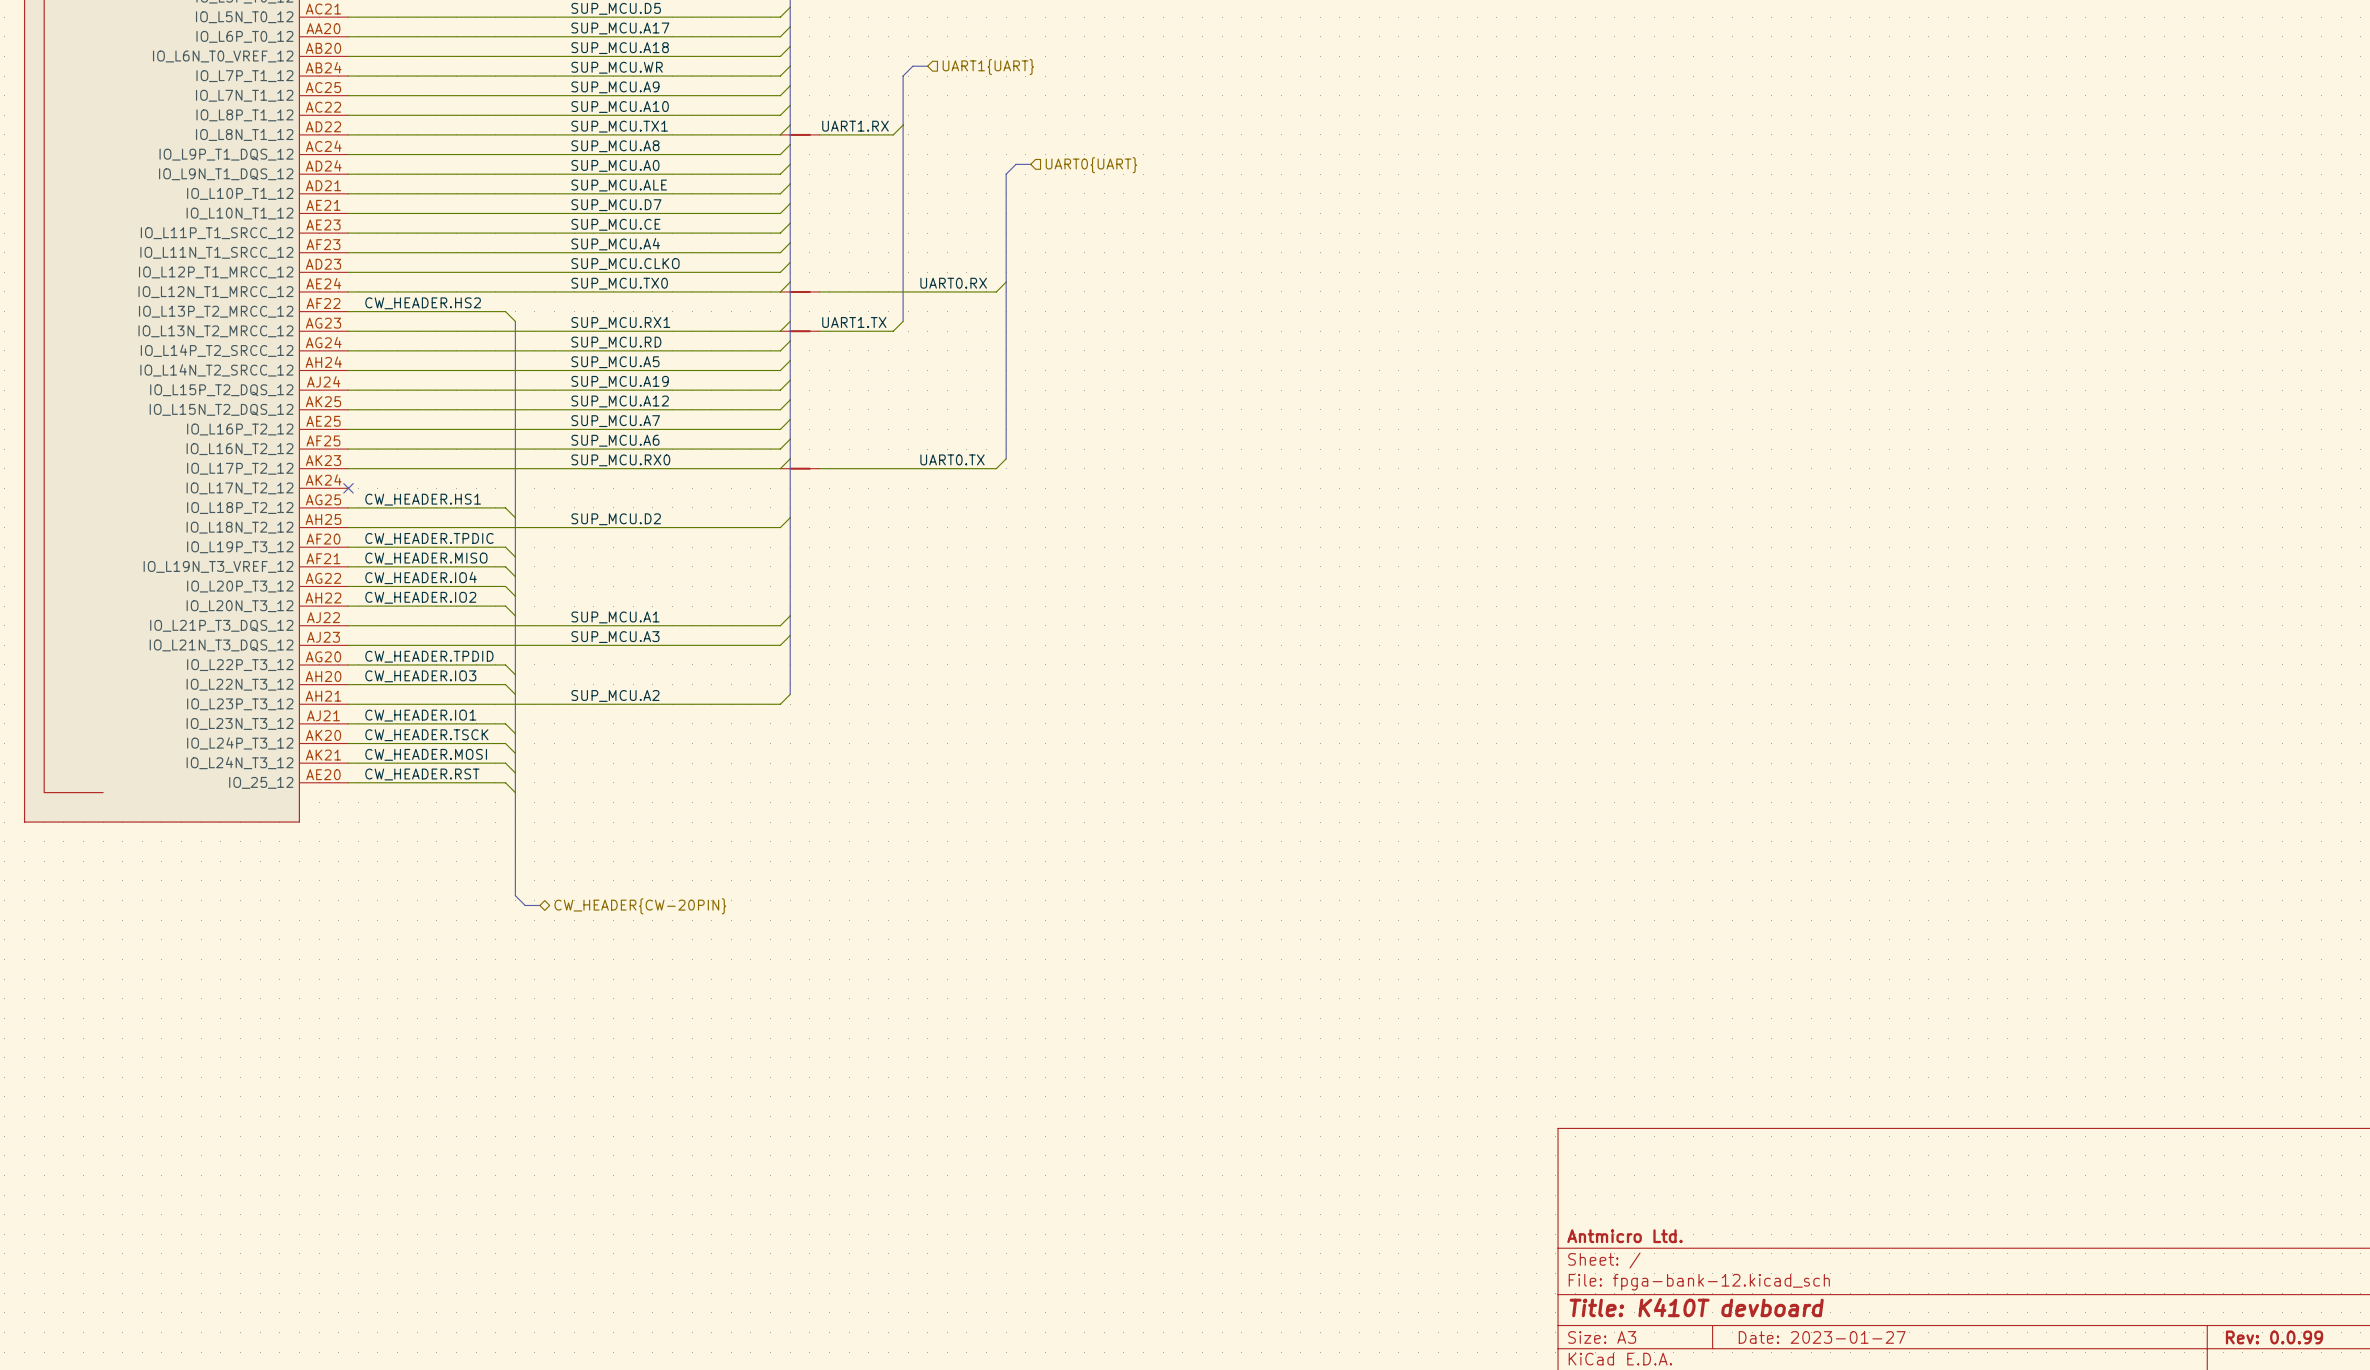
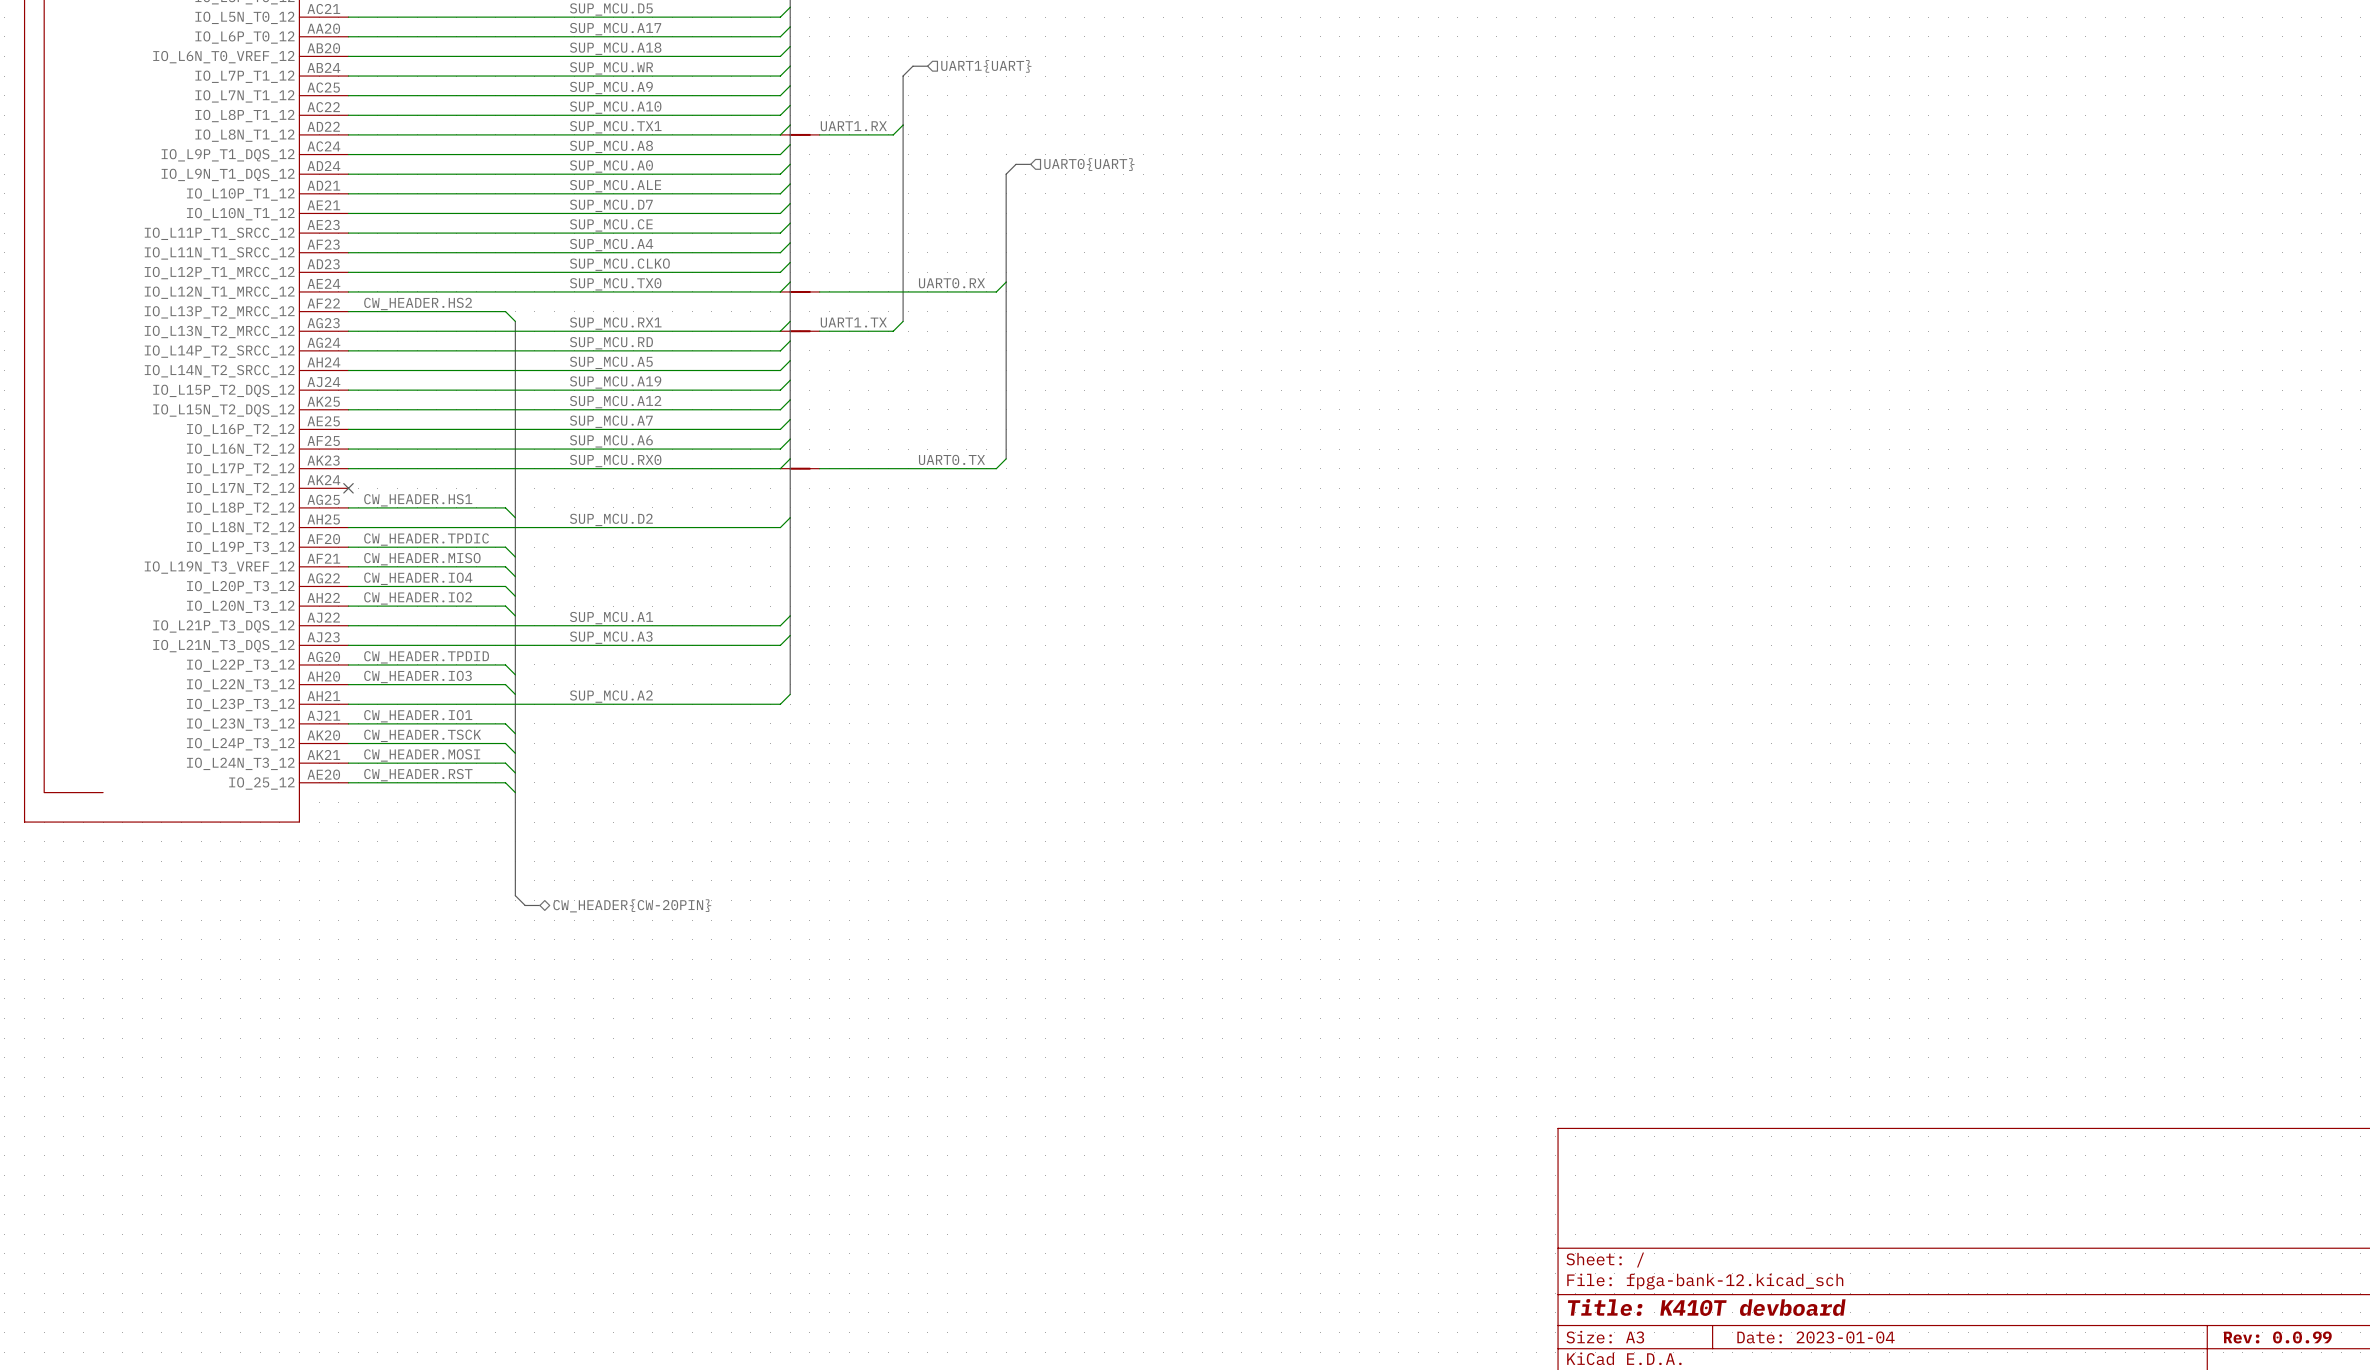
title block: Antmicro Ltd. (1624, 1236) -> none
title block: Date: 2023-01-27 (1822, 1337) -> Date: 2023-01-04 (1816, 1337)

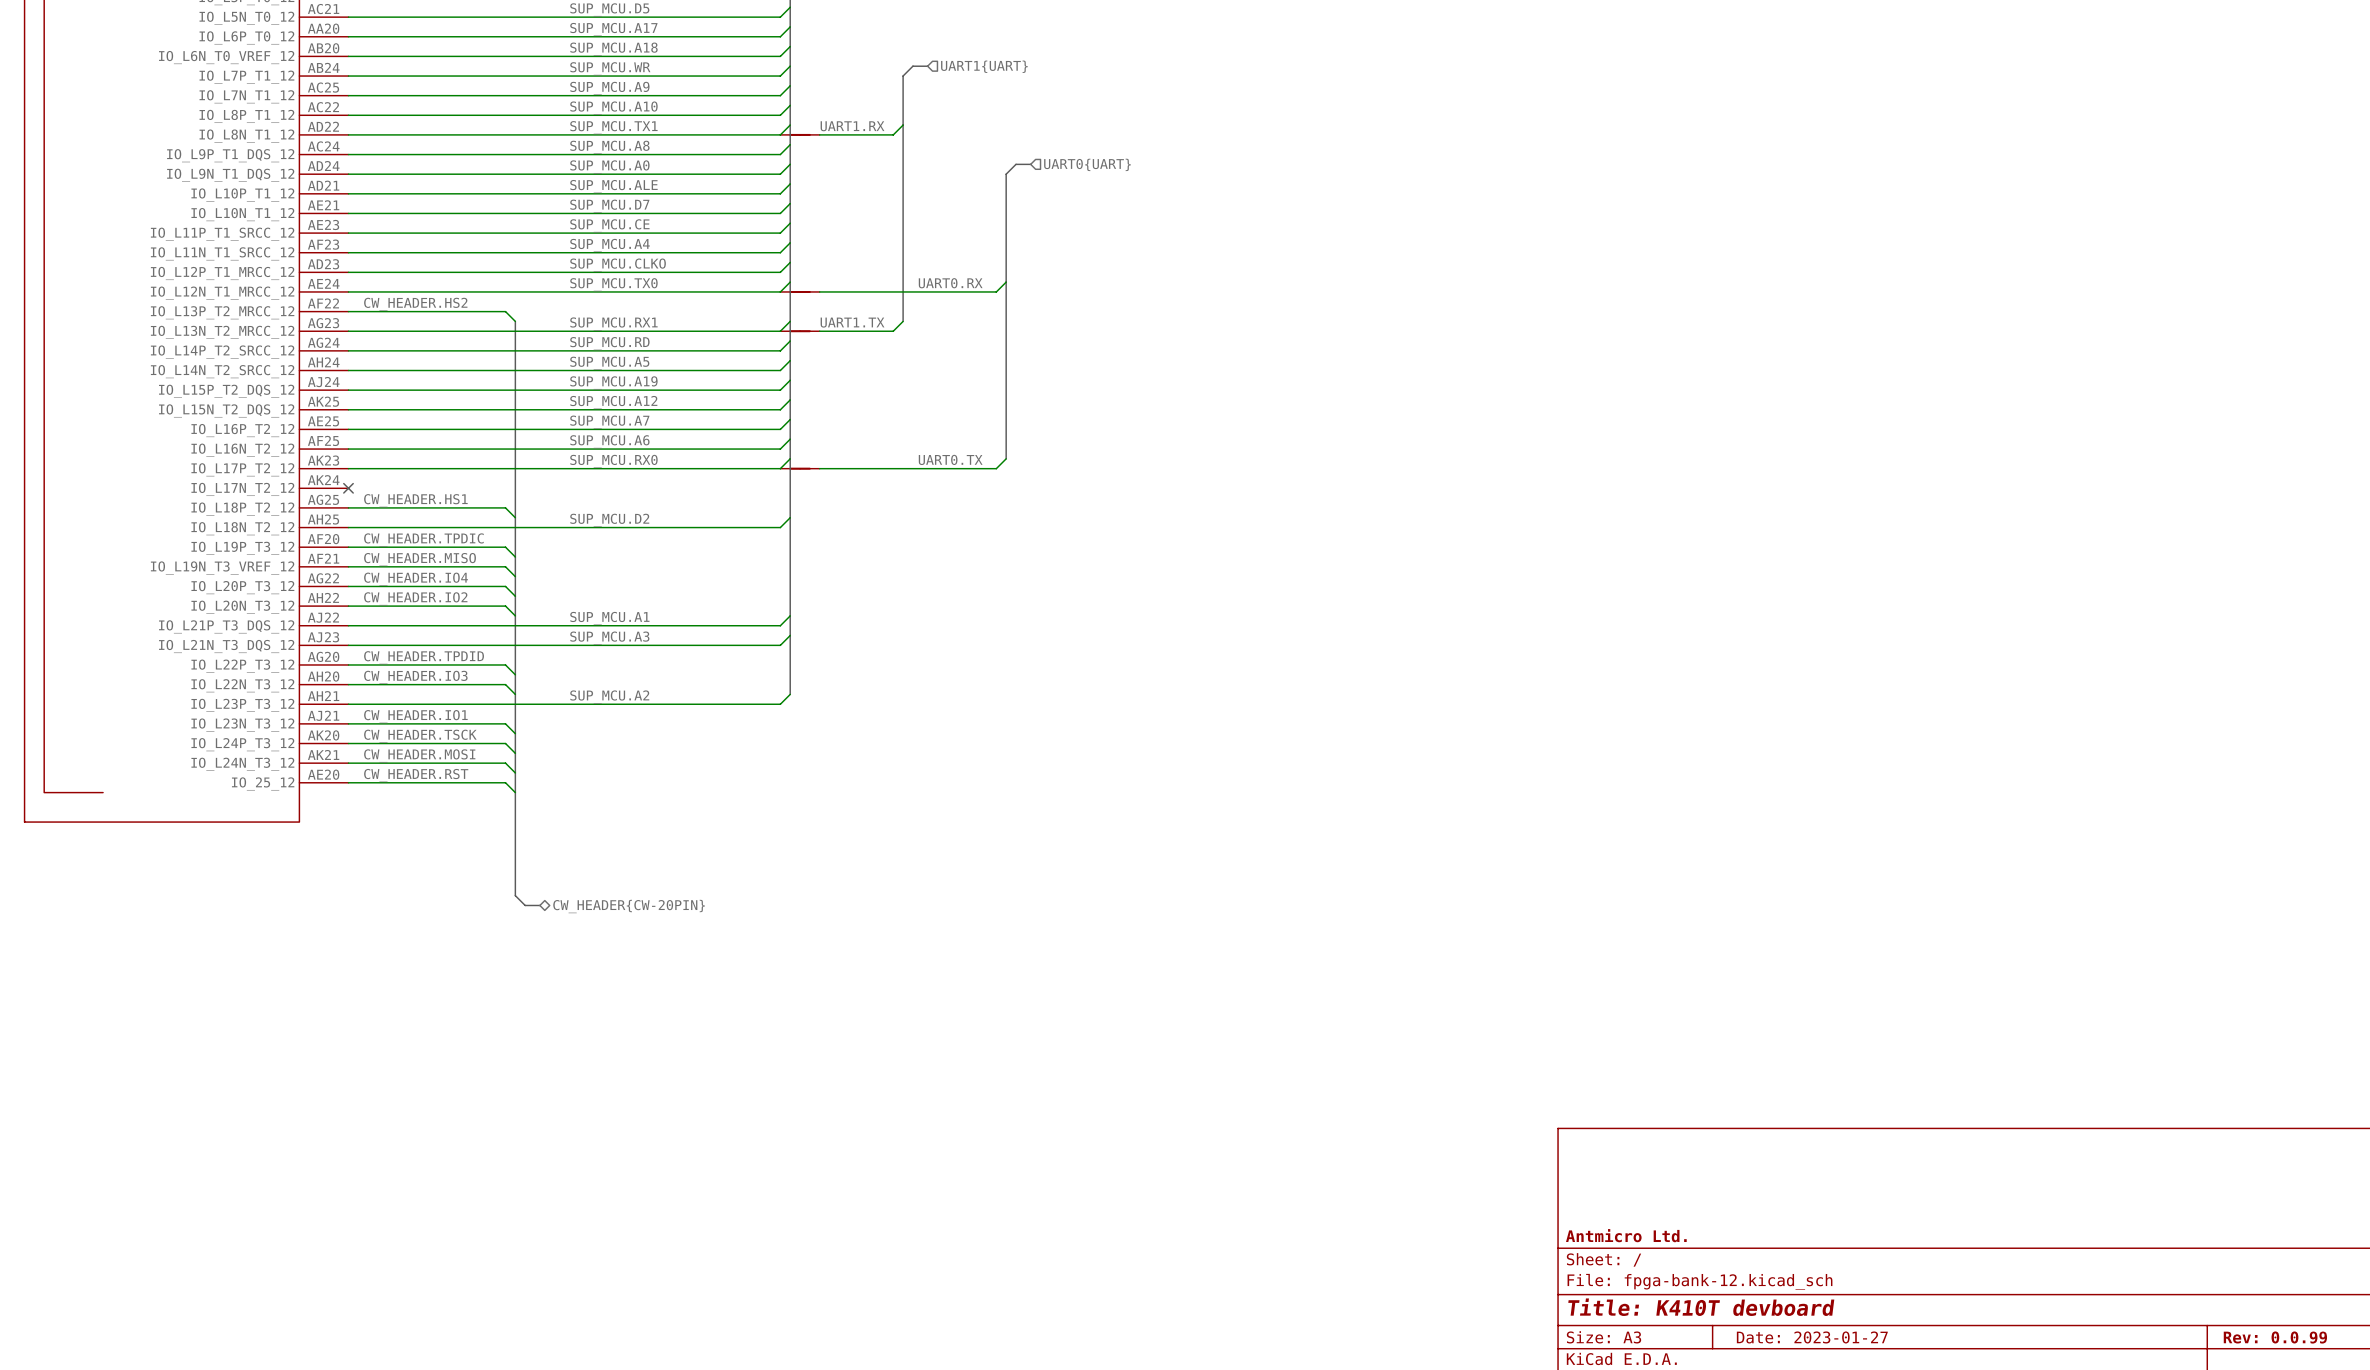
title block: none -> Antmicro Ltd. (1626, 1235)
title block: Date: 2023-01-04 (1816, 1337) -> Date: 2023-01-27 (1812, 1337)

